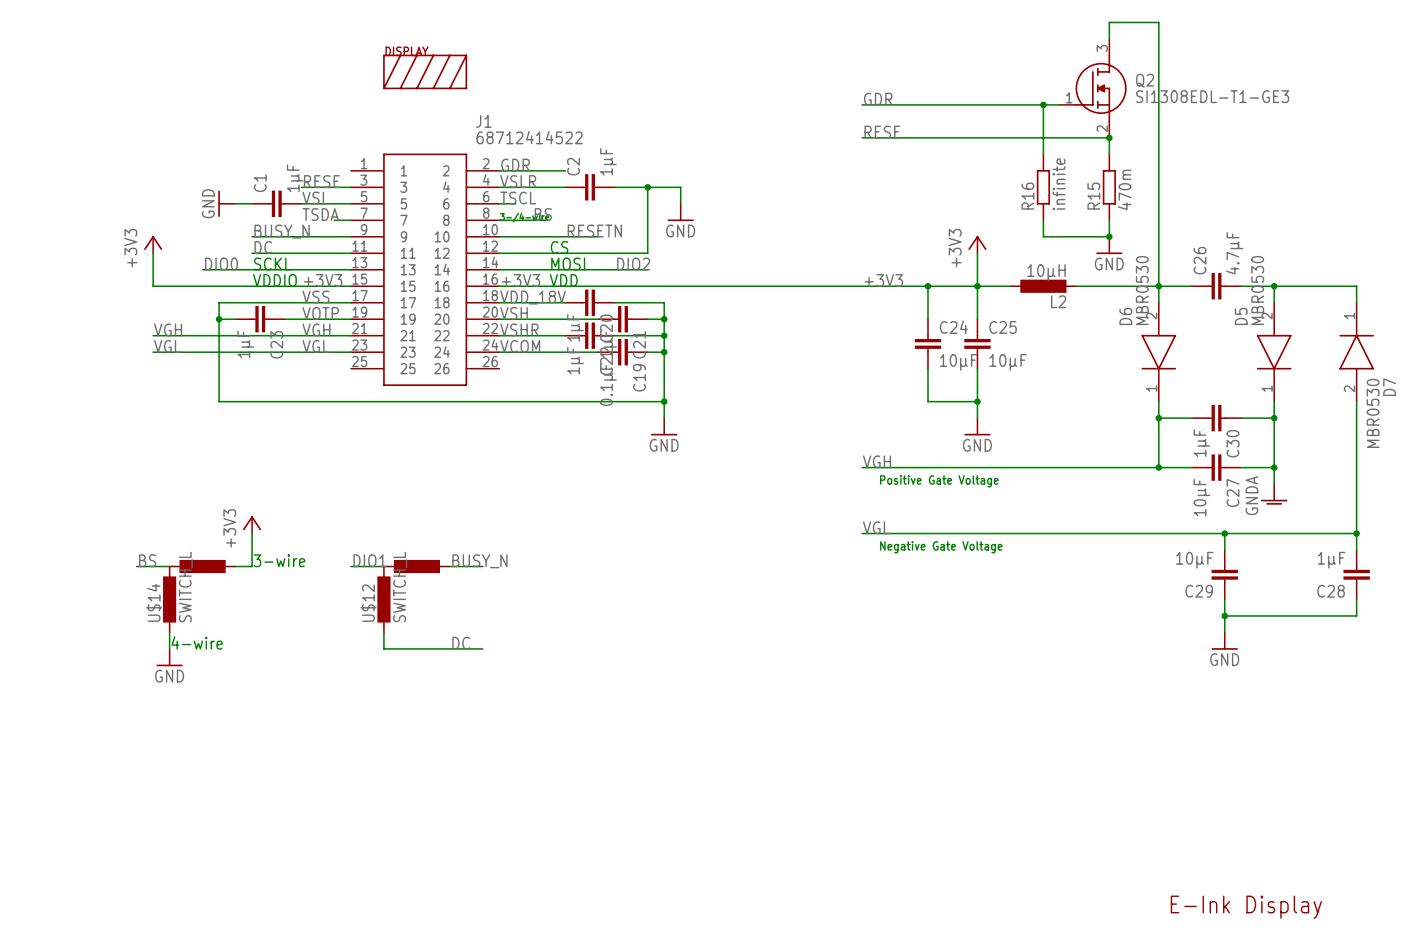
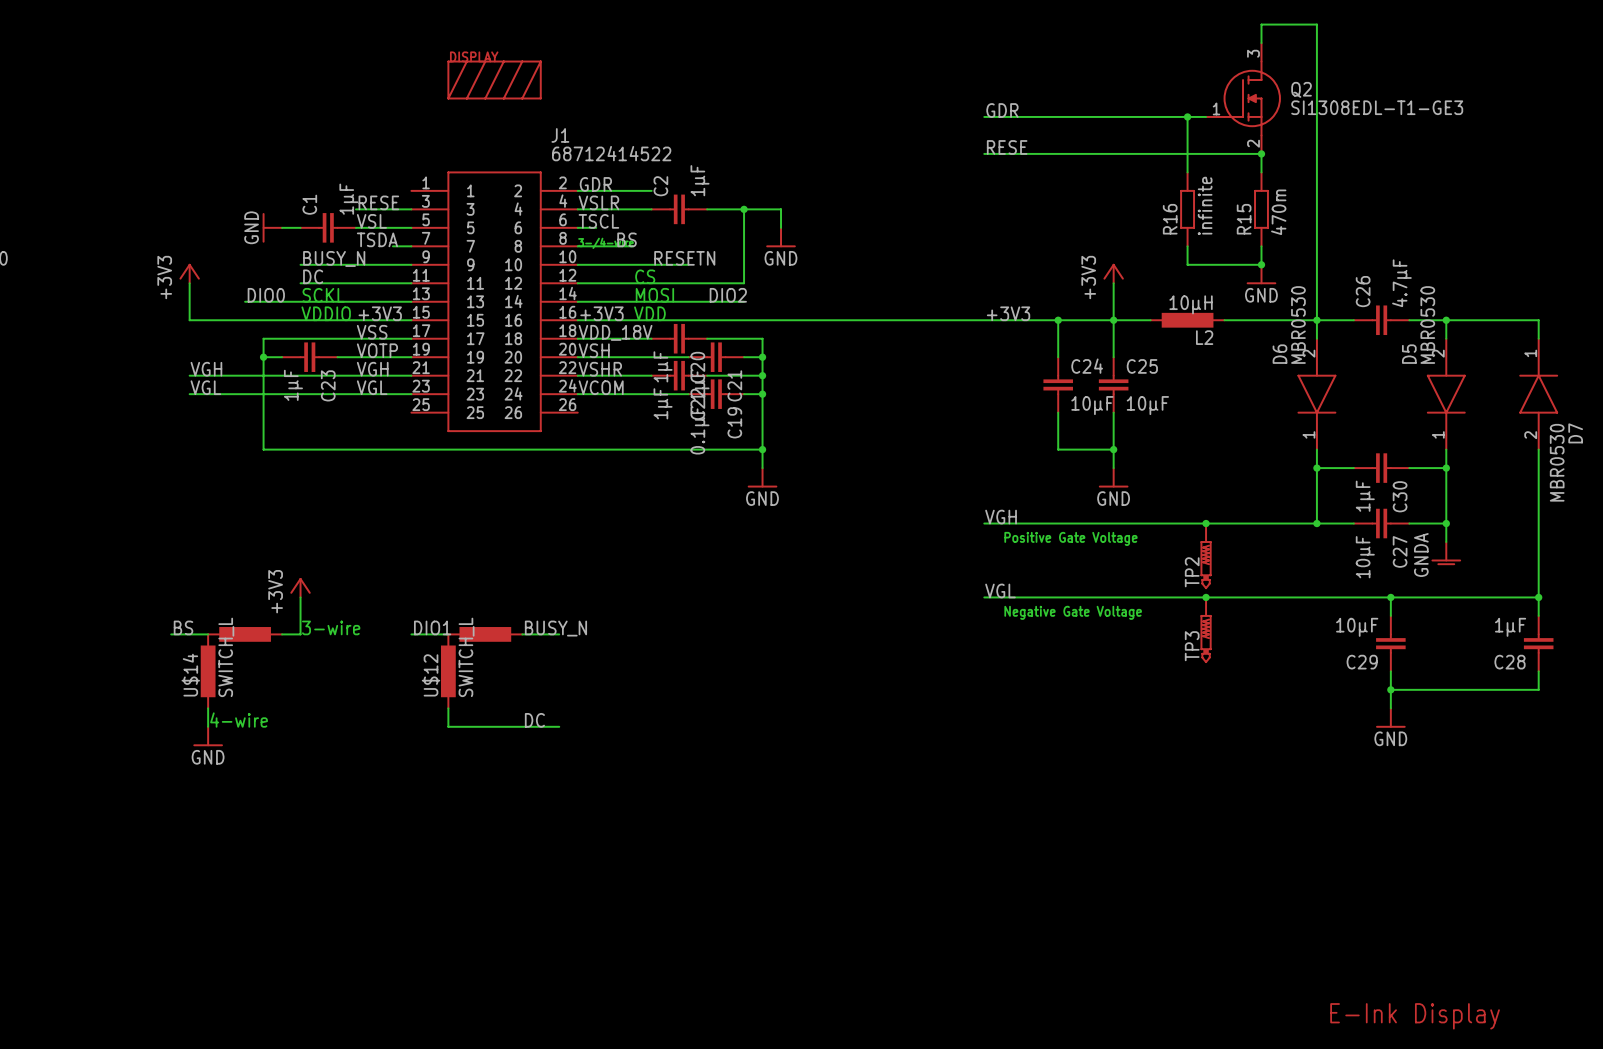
junction: none -> (1206, 523)
TP2: none -> (1206, 556)
junction: none -> (1206, 597)
TP3: none -> (1206, 630)

